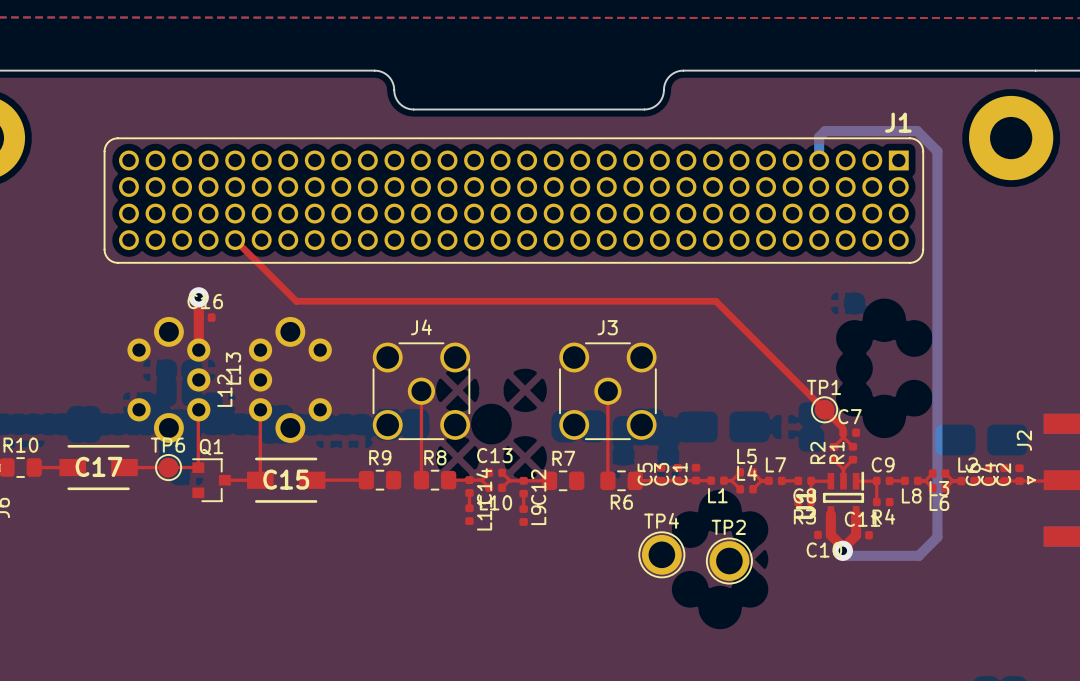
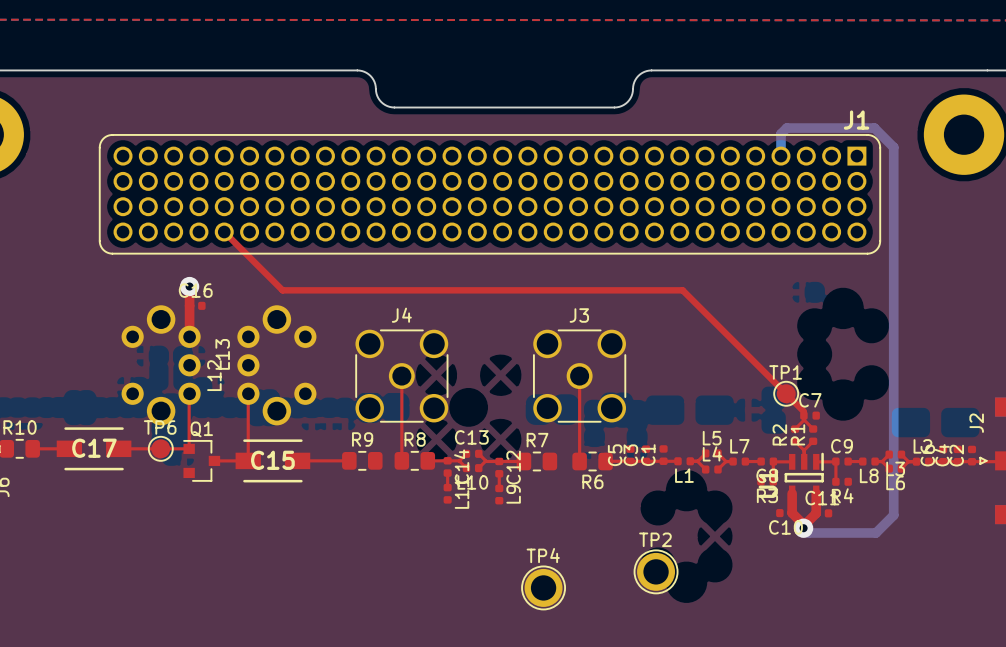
TP4 position: (661, 554) -> (543, 587)
TP2 position: (729, 561) -> (656, 571)

